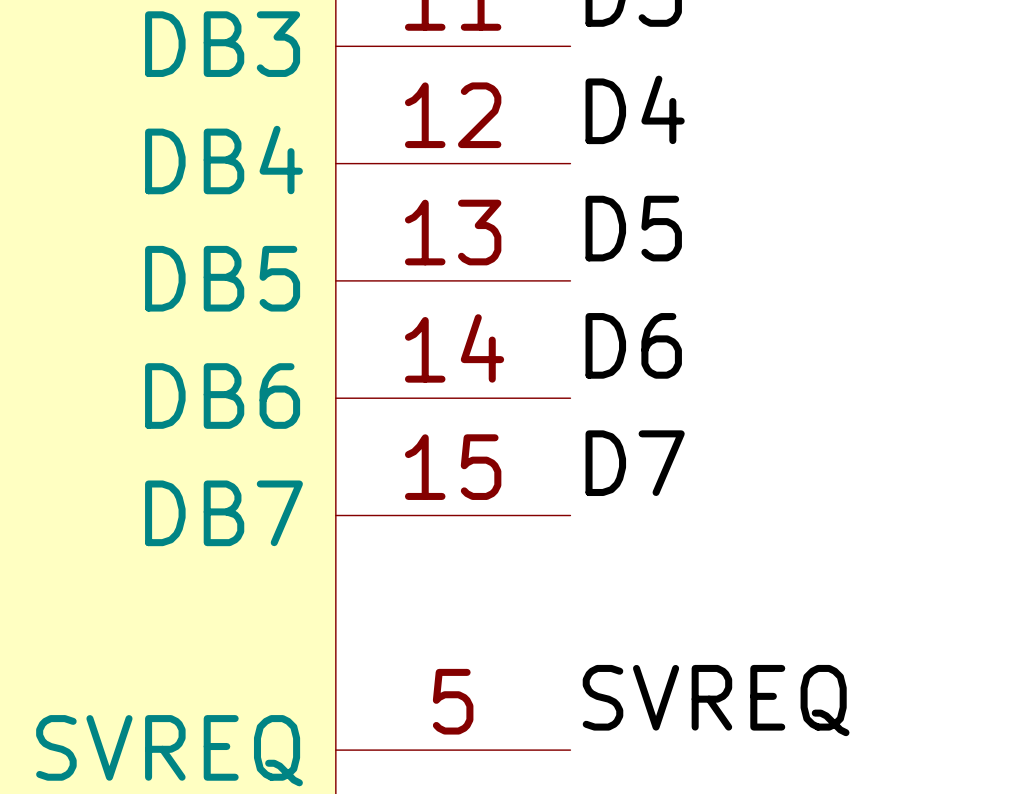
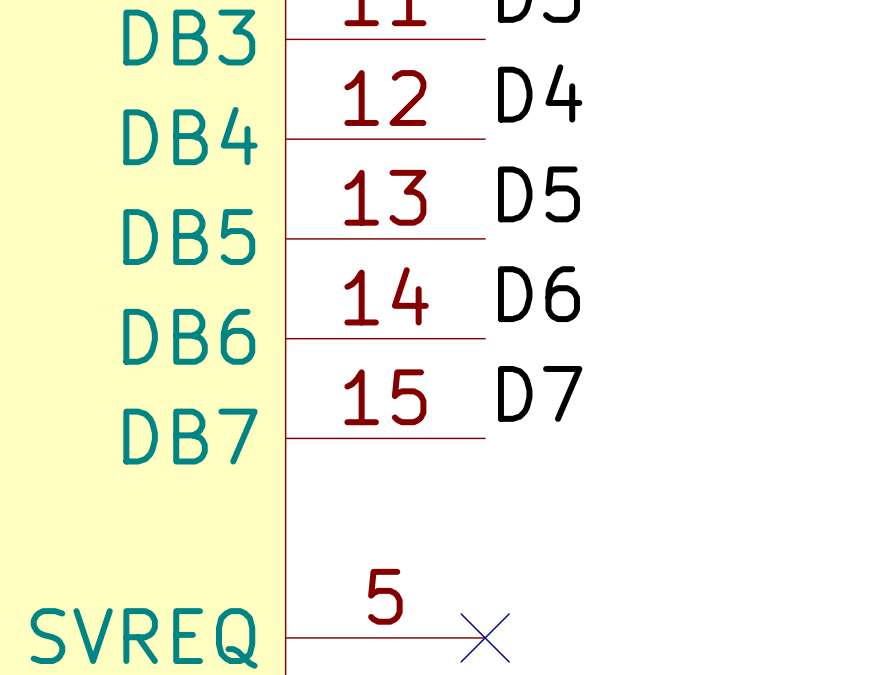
label: SVREQ (716, 700) -> none
no-connect mark: none -> (485, 637)

